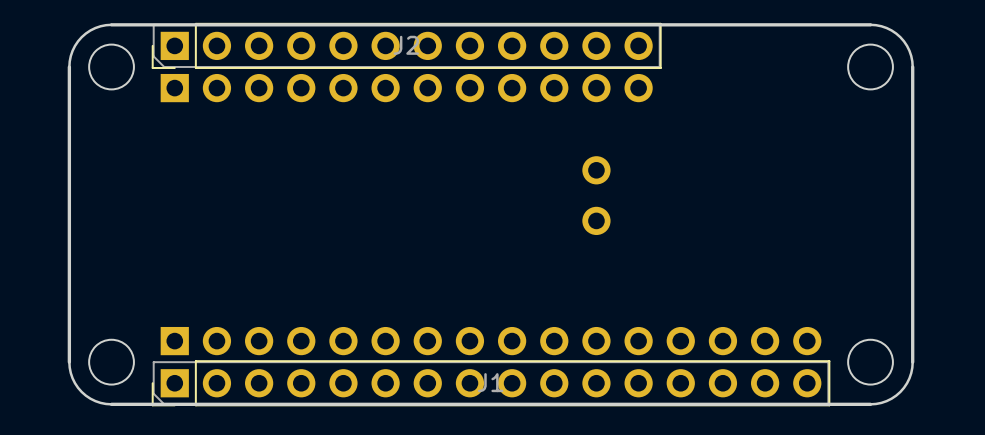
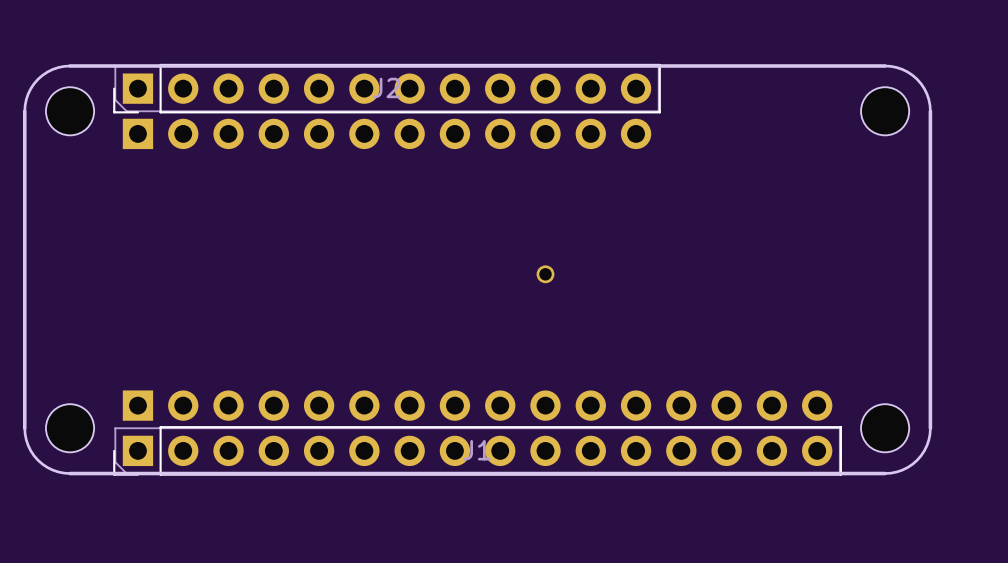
part: (596, 170) -> none
part: none -> (545, 274)
part: (596, 220) -> none

